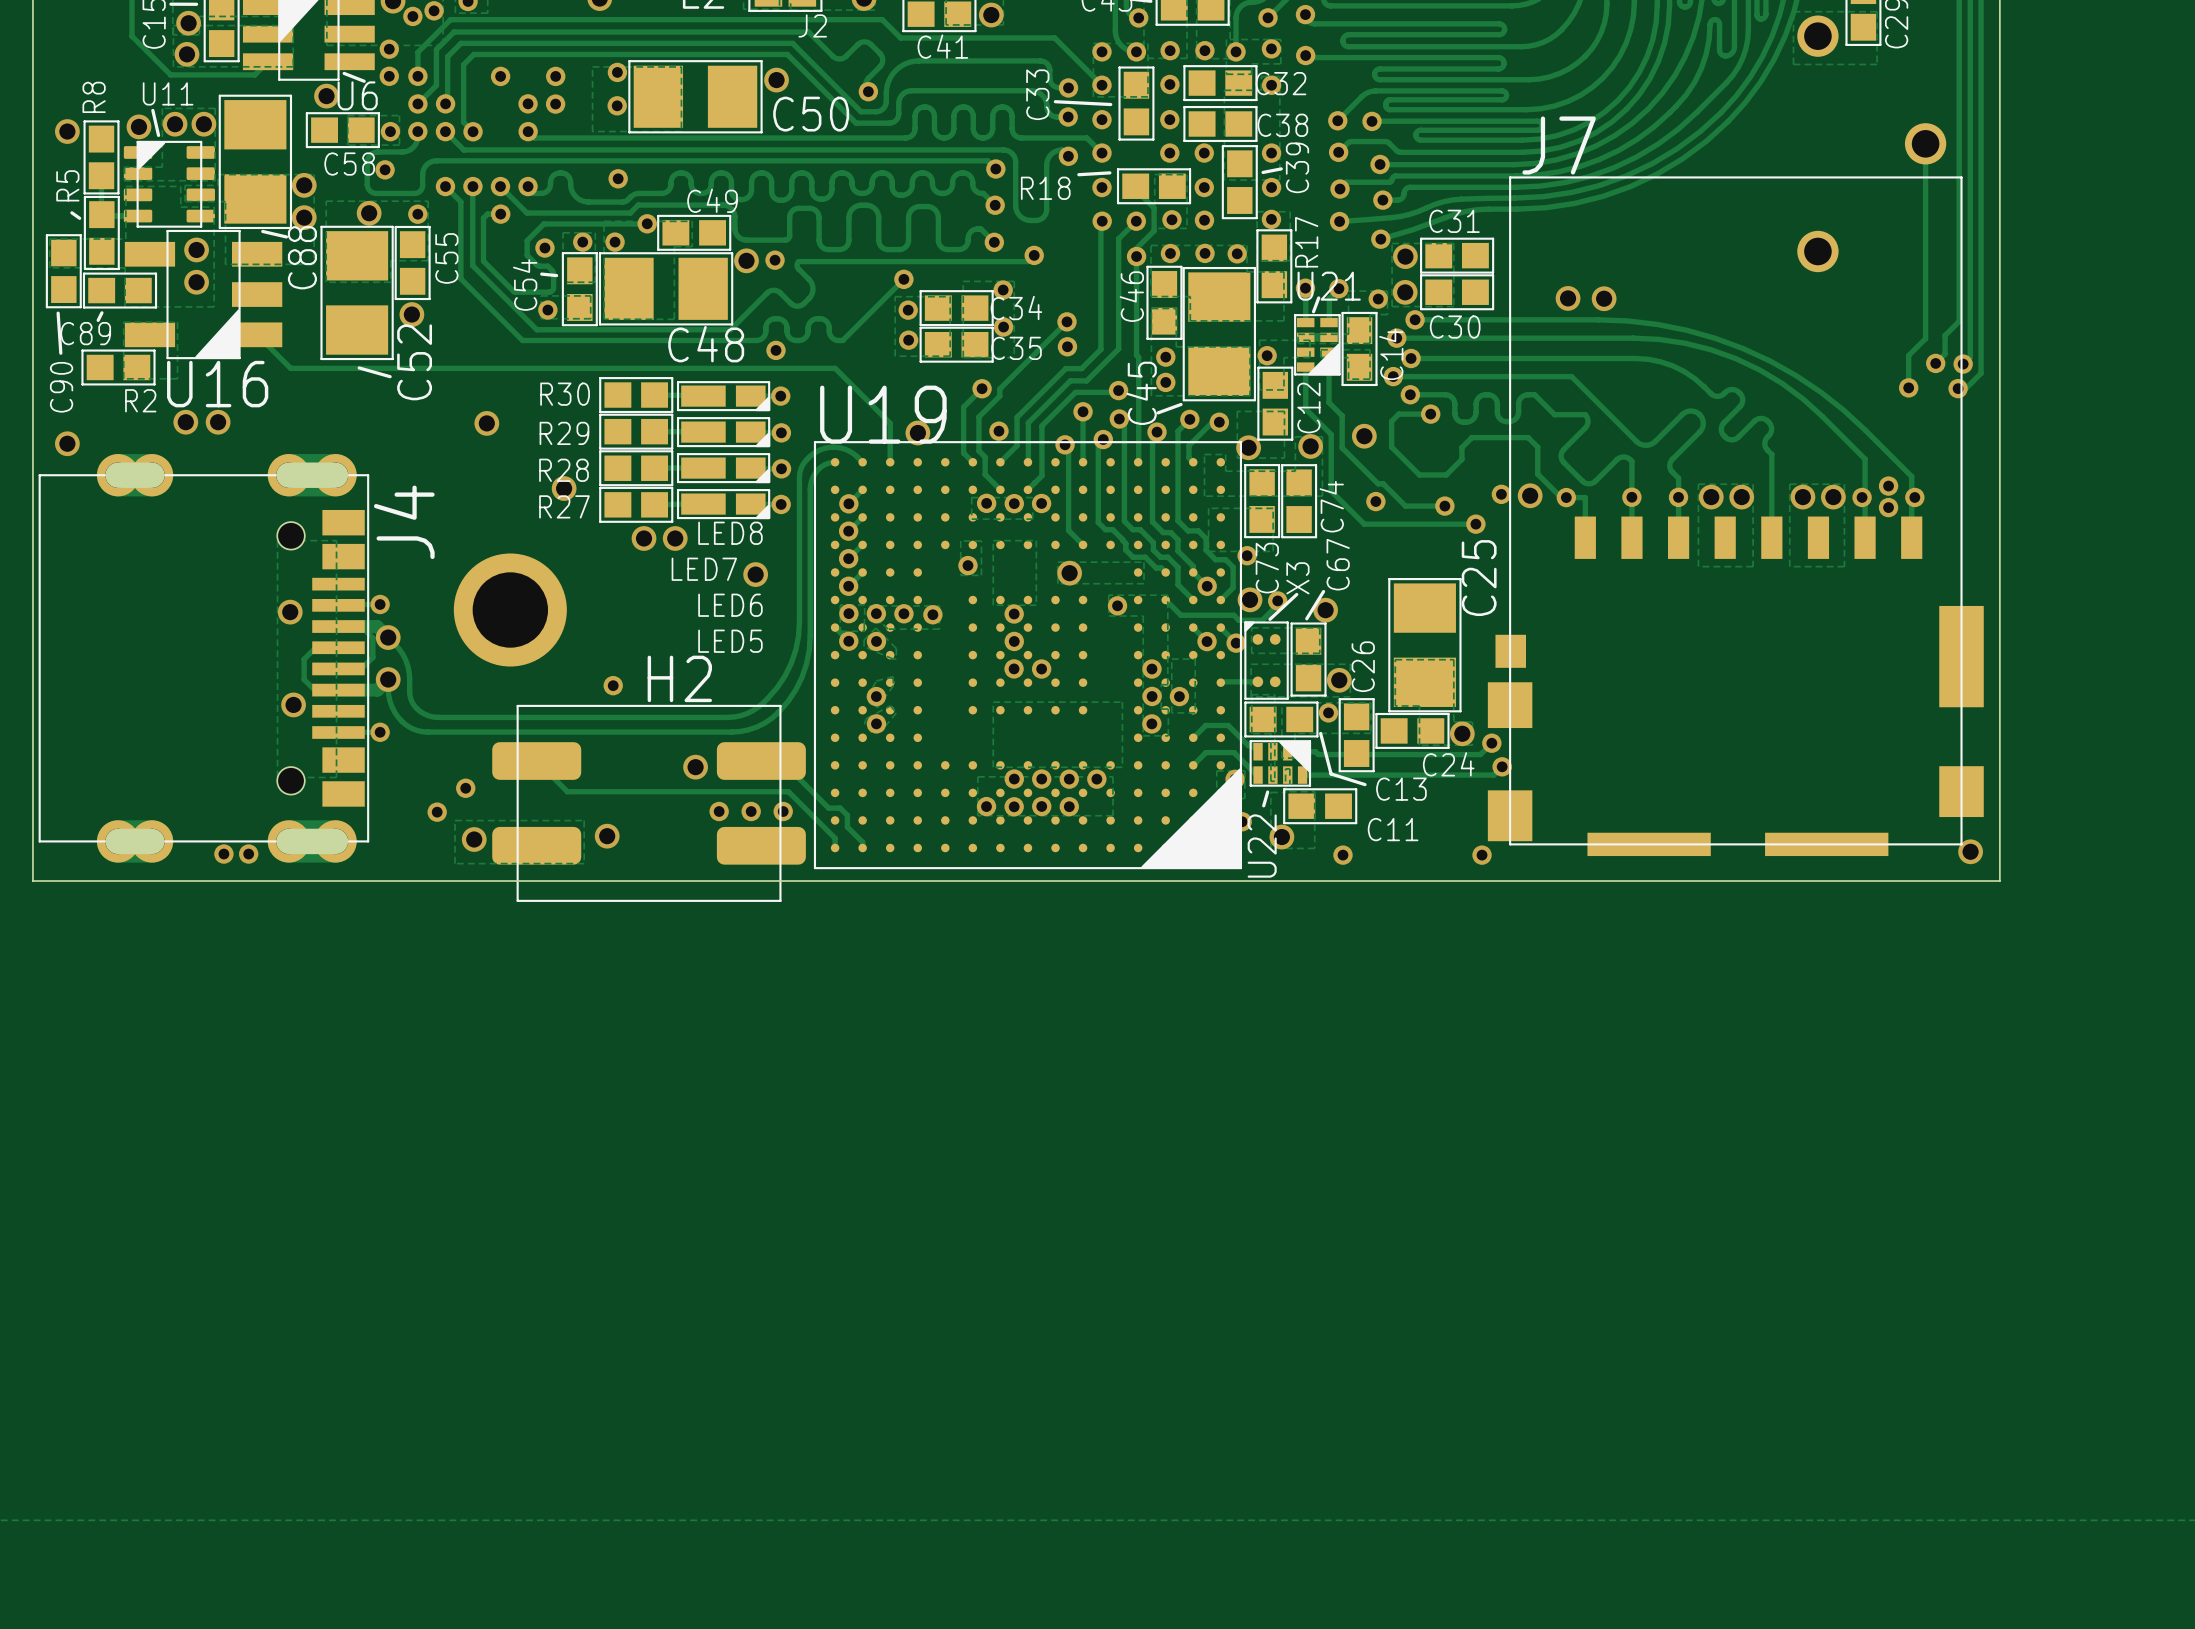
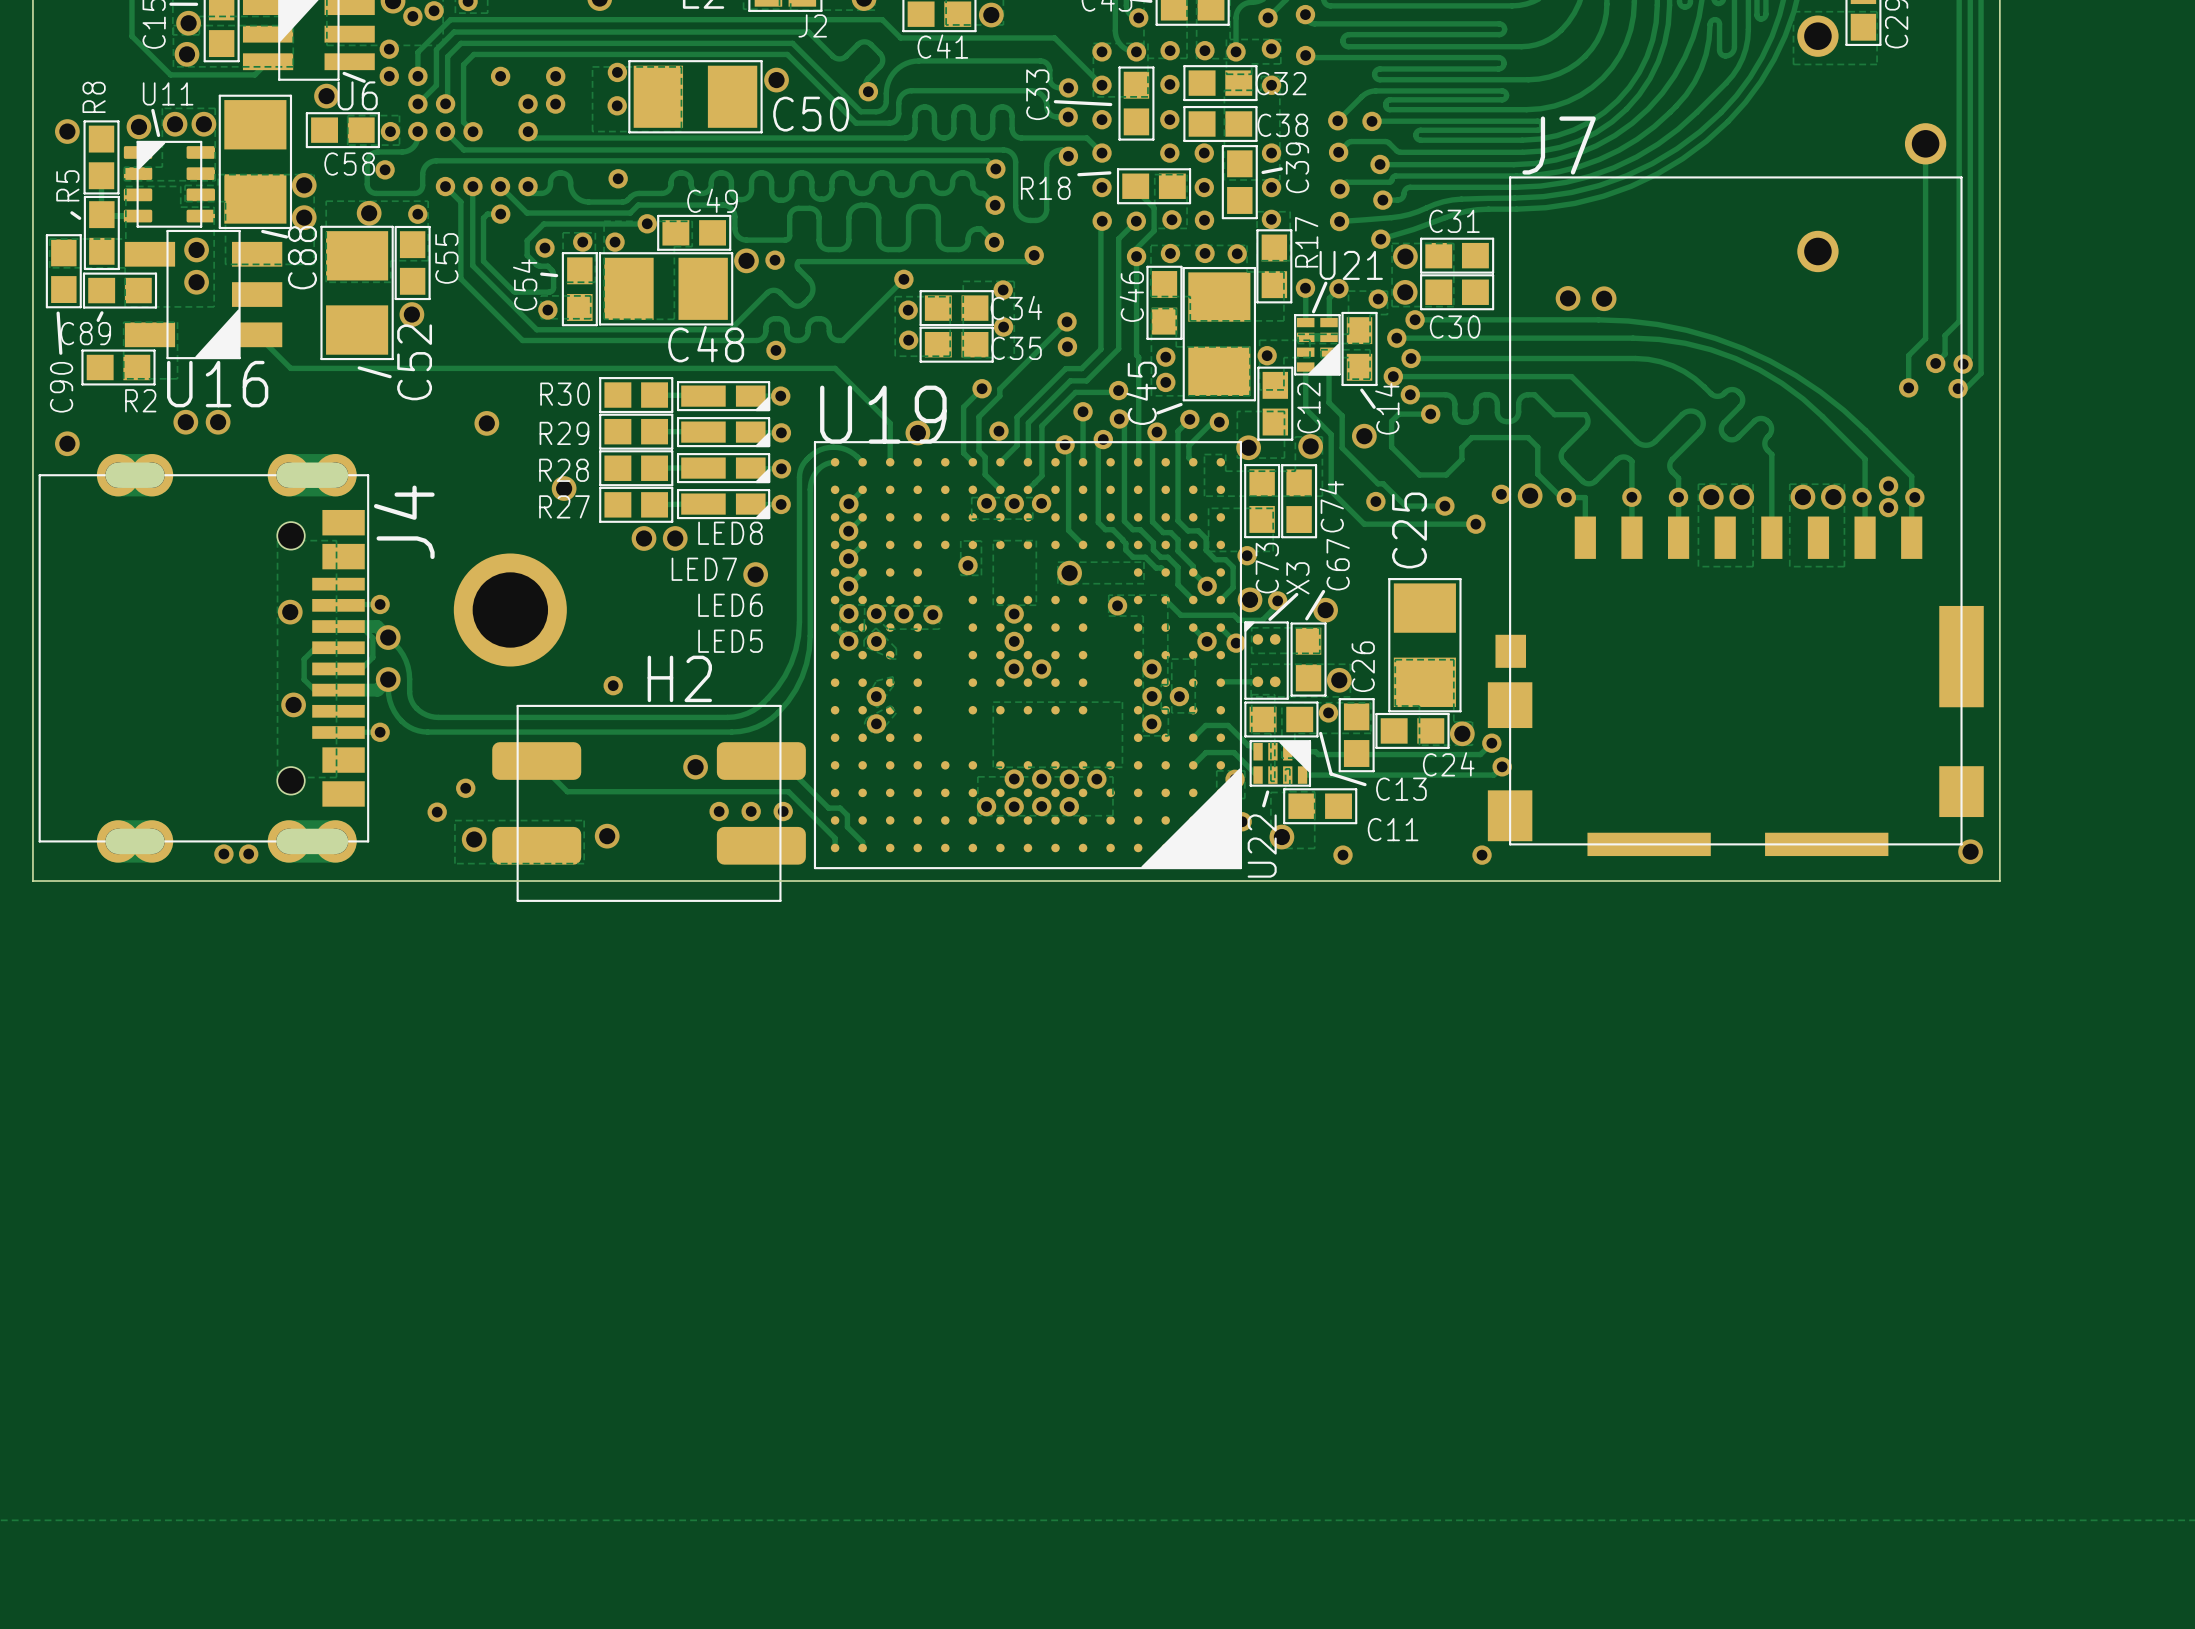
U21 name position: U21 (1329, 286) -> U21 (1351, 265)
line: (1318, 297) (1313, 311) -> (1325, 283) (1313, 311)
C14 name position: C14 (1391, 354) -> C14 (1387, 408)
line: none -> (1361, 390) (1374, 407)
C25 name position: C25 (1479, 578) -> C25 (1409, 530)

